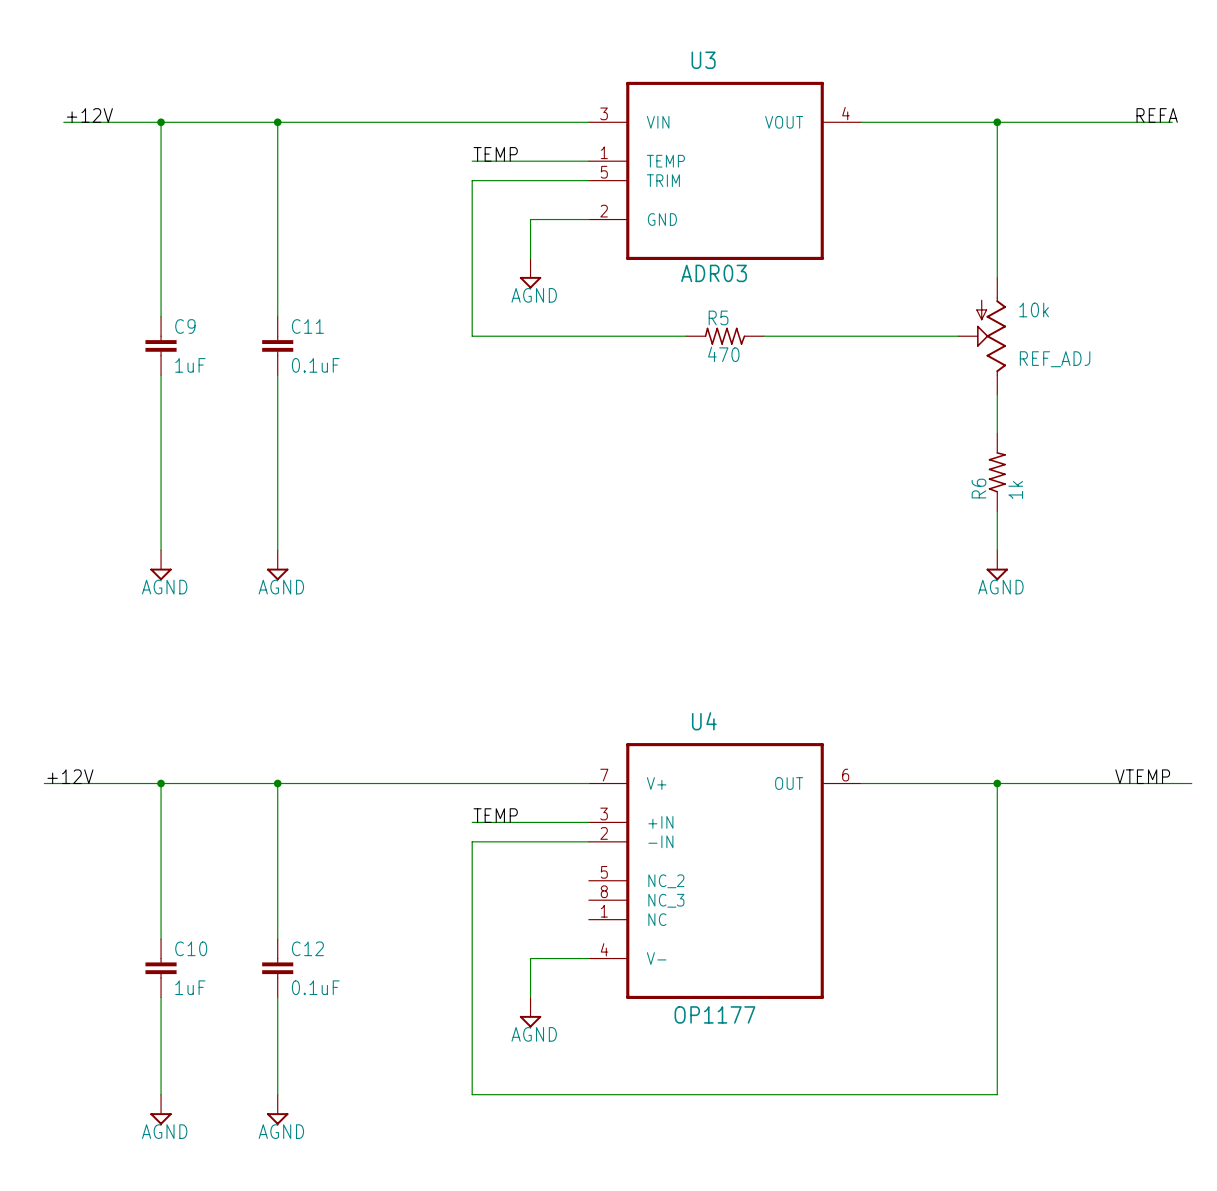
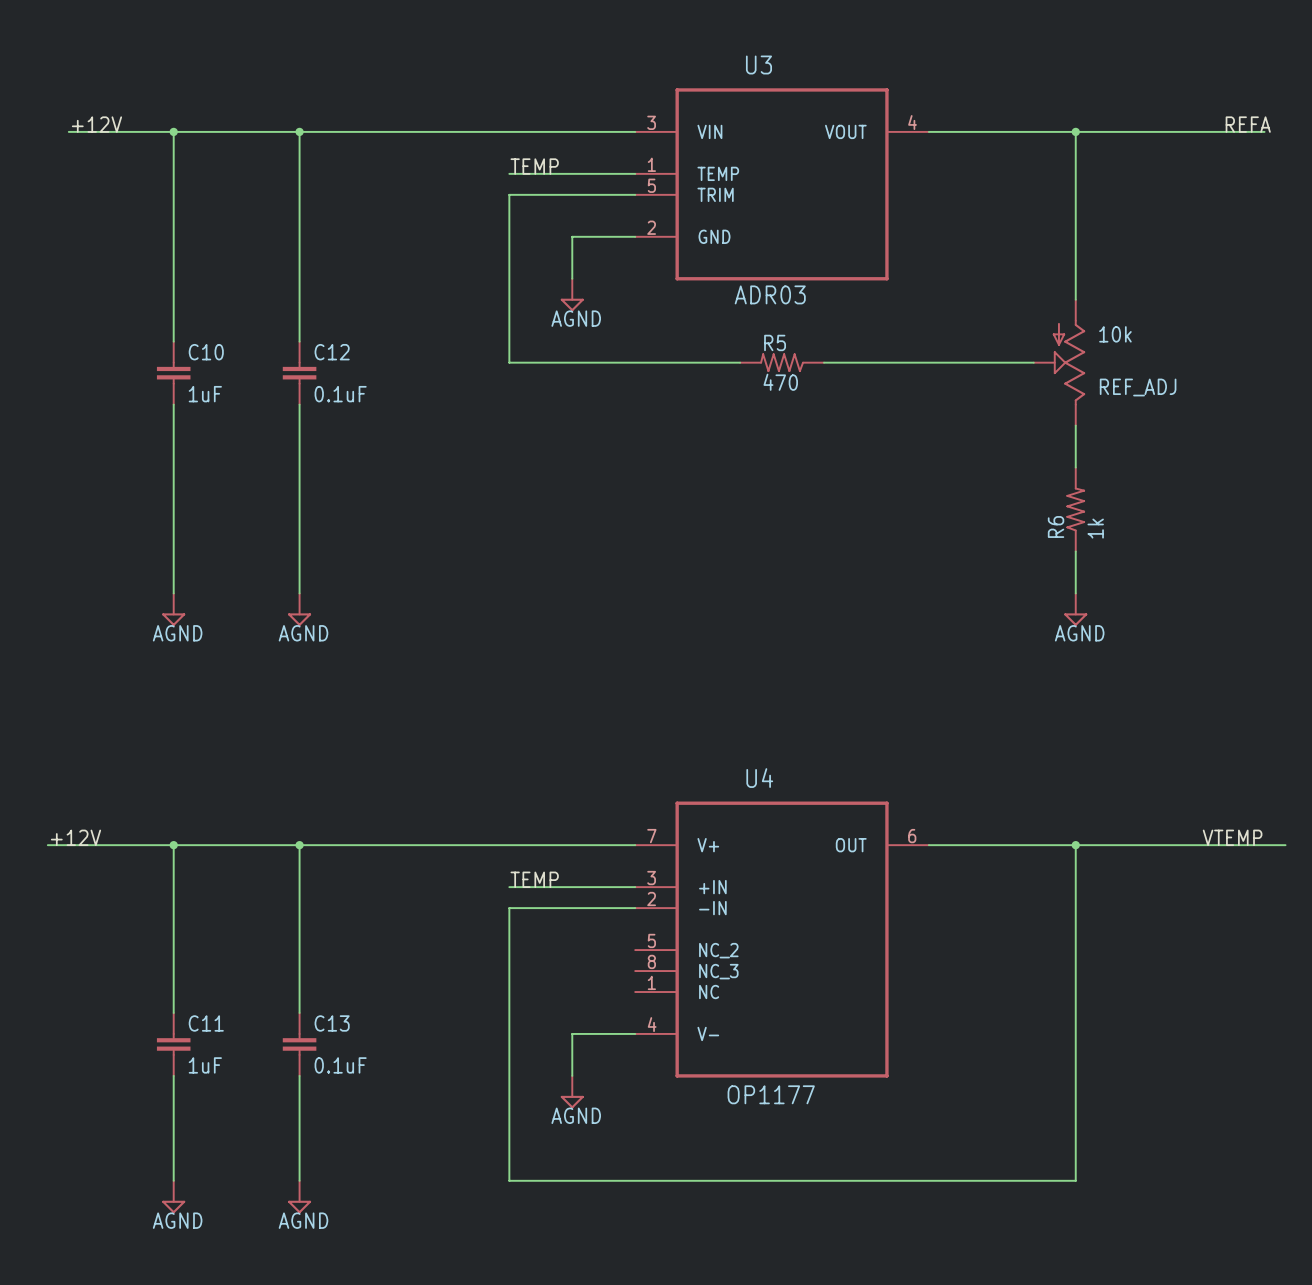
C9 name: C9 (185, 326) -> C10 (206, 352)
C11 name: C11 (307, 326) -> C12 (332, 352)
C10 name: C10 (191, 948) -> C11 (206, 1023)
C12 name: C12 (307, 948) -> C13 (332, 1023)

